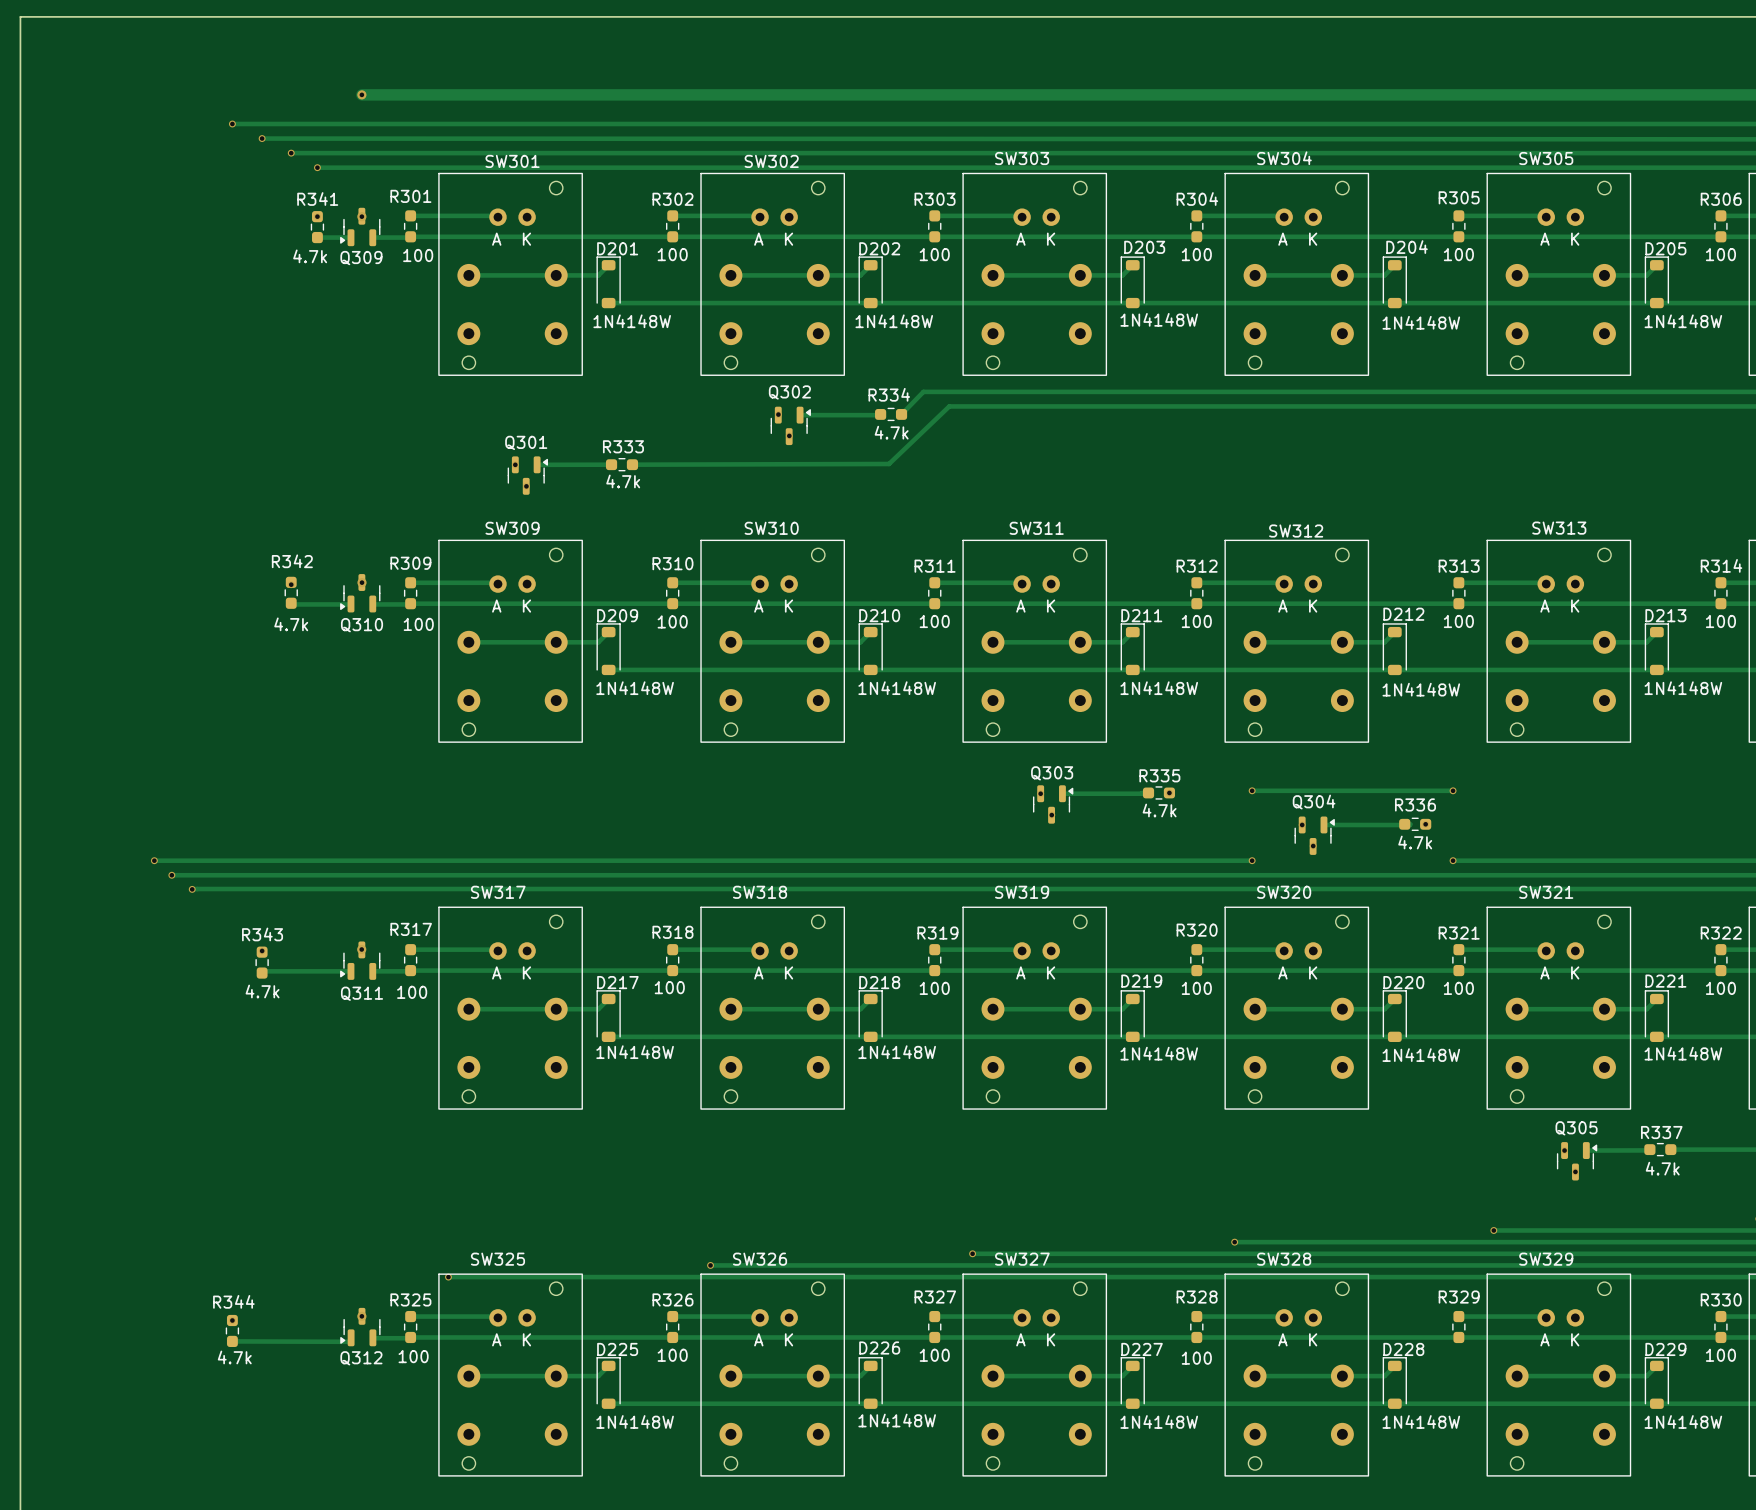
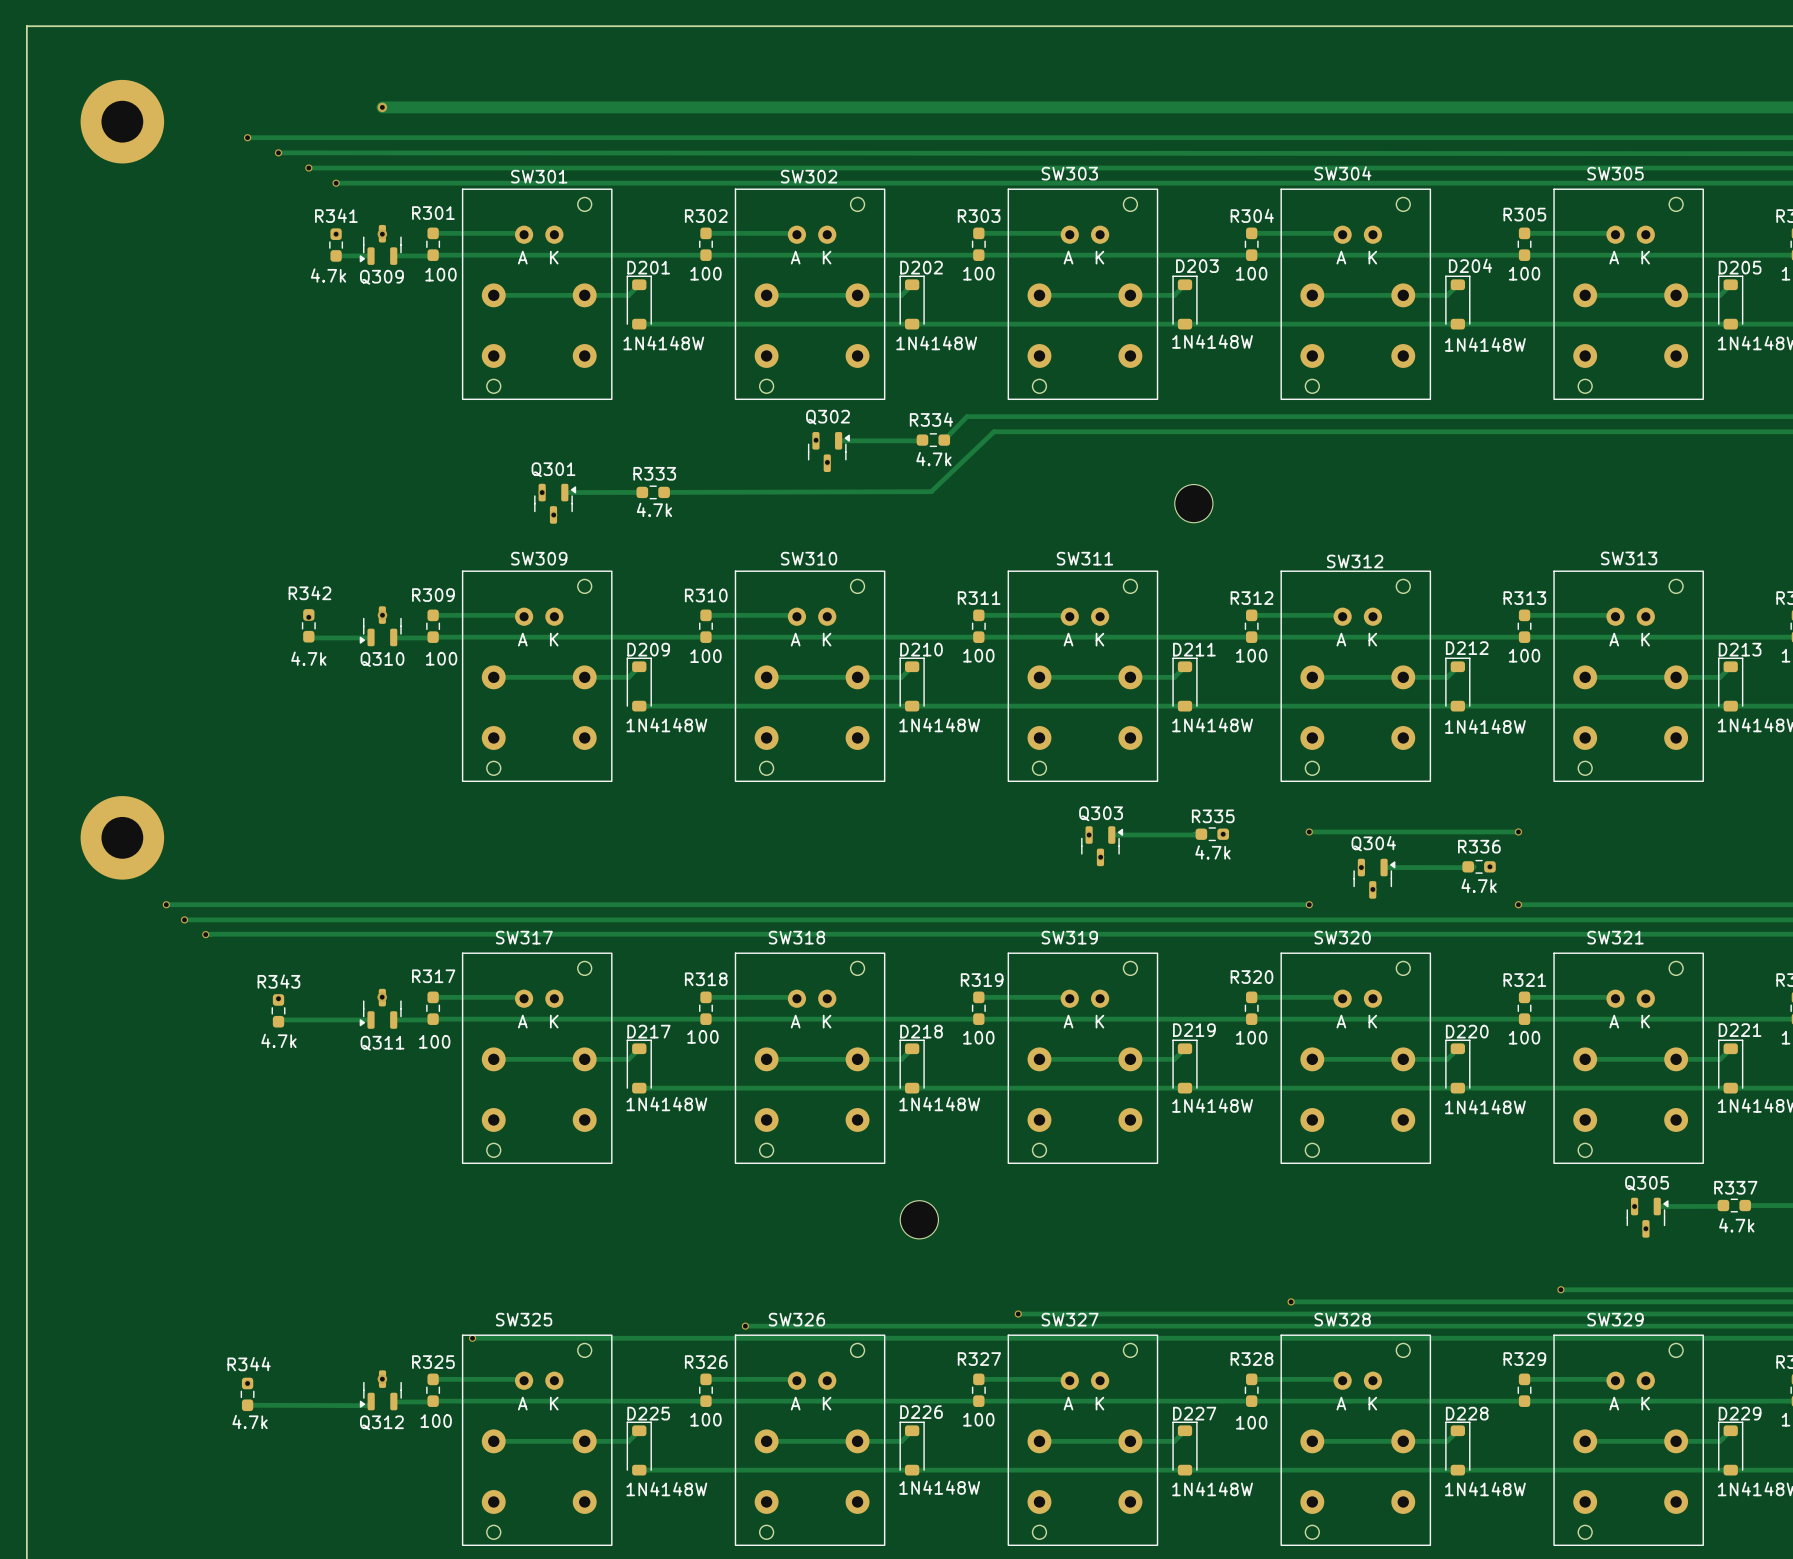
part: none -> (122, 121)
part: none -> (1193, 503)
part: none -> (122, 837)
part: none -> (919, 1219)

